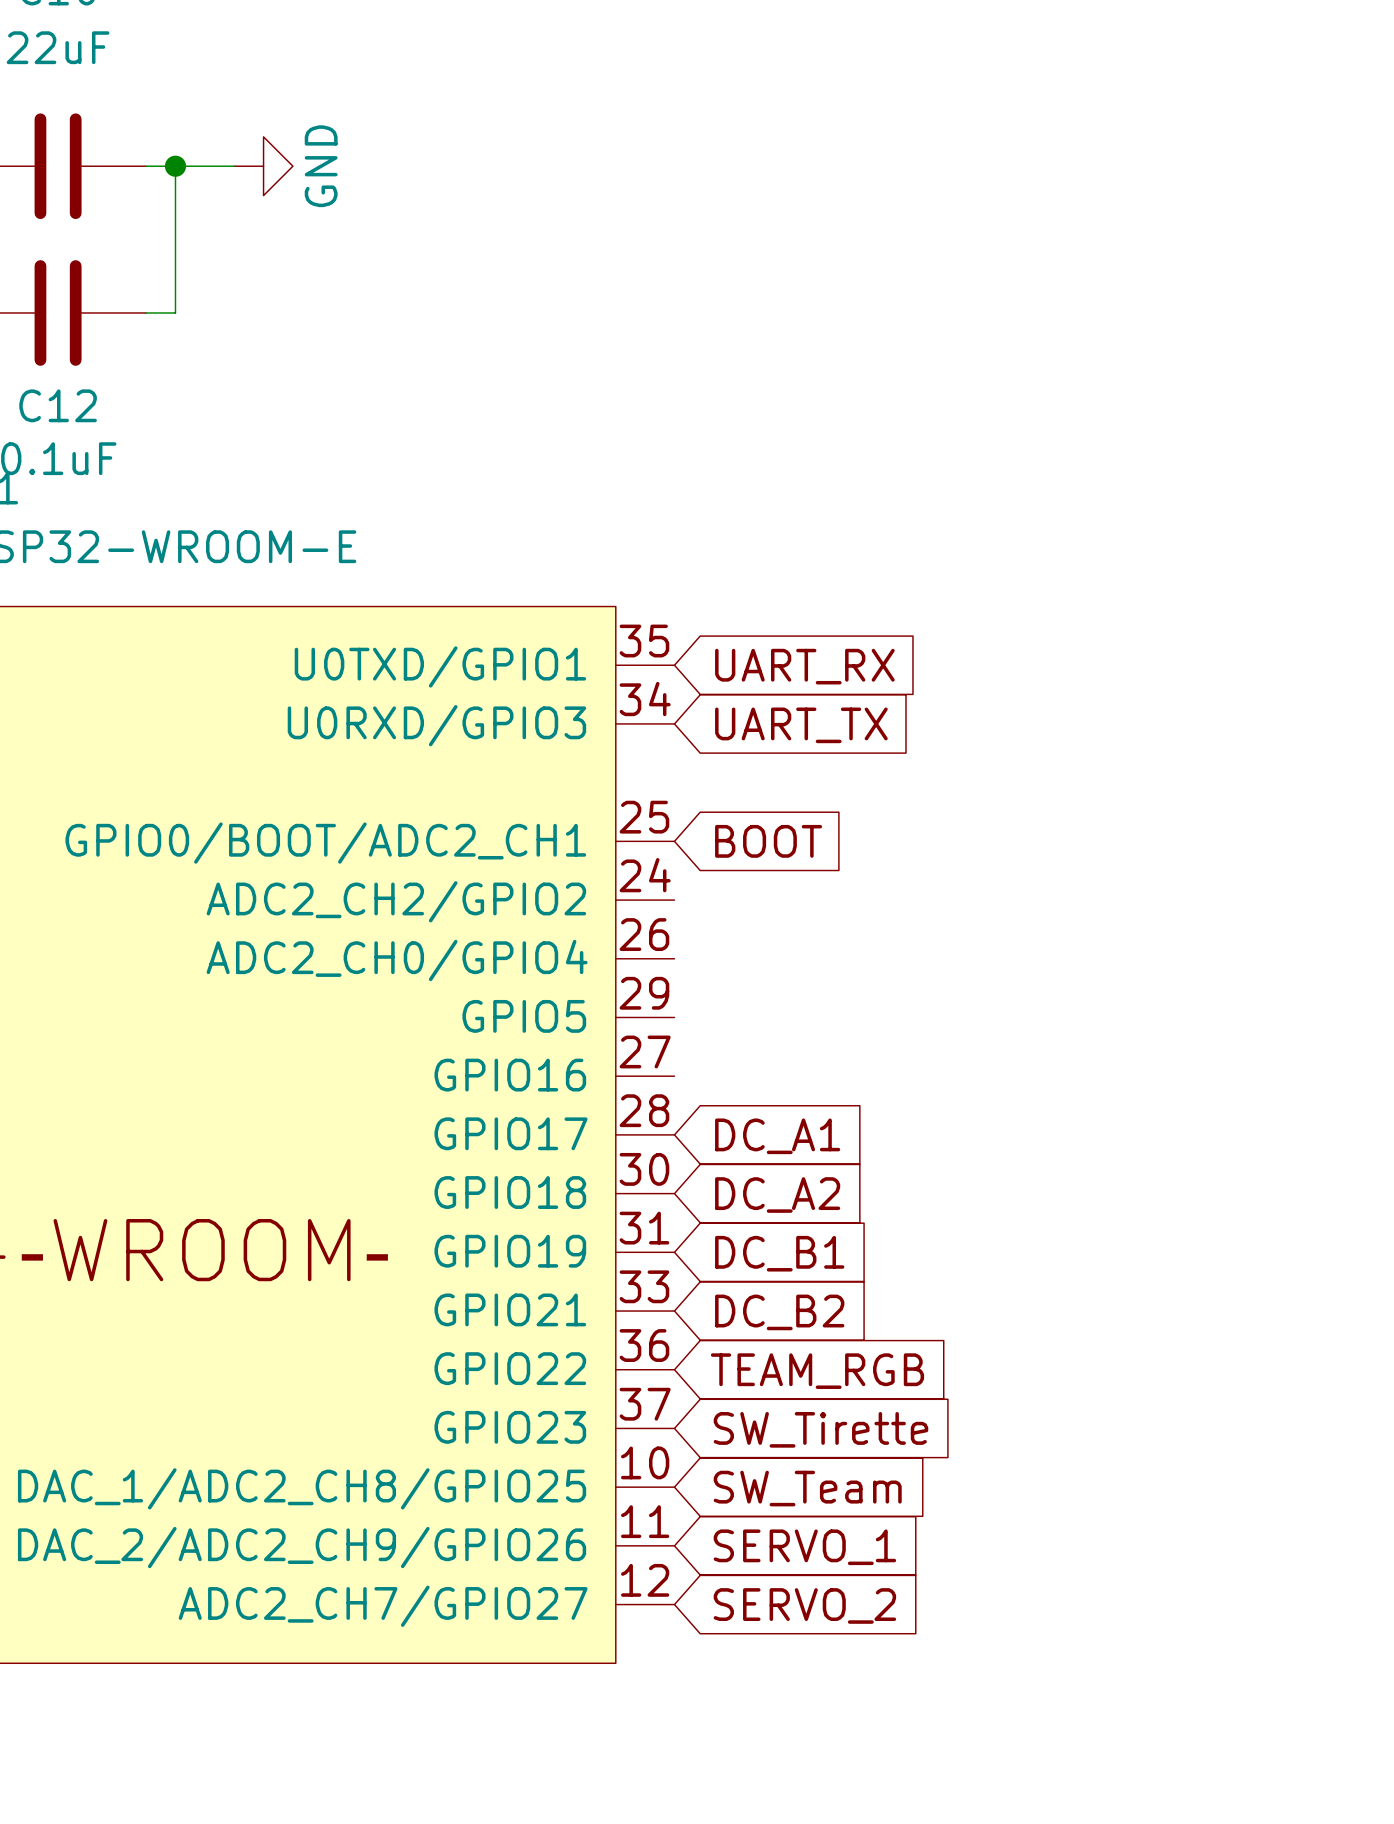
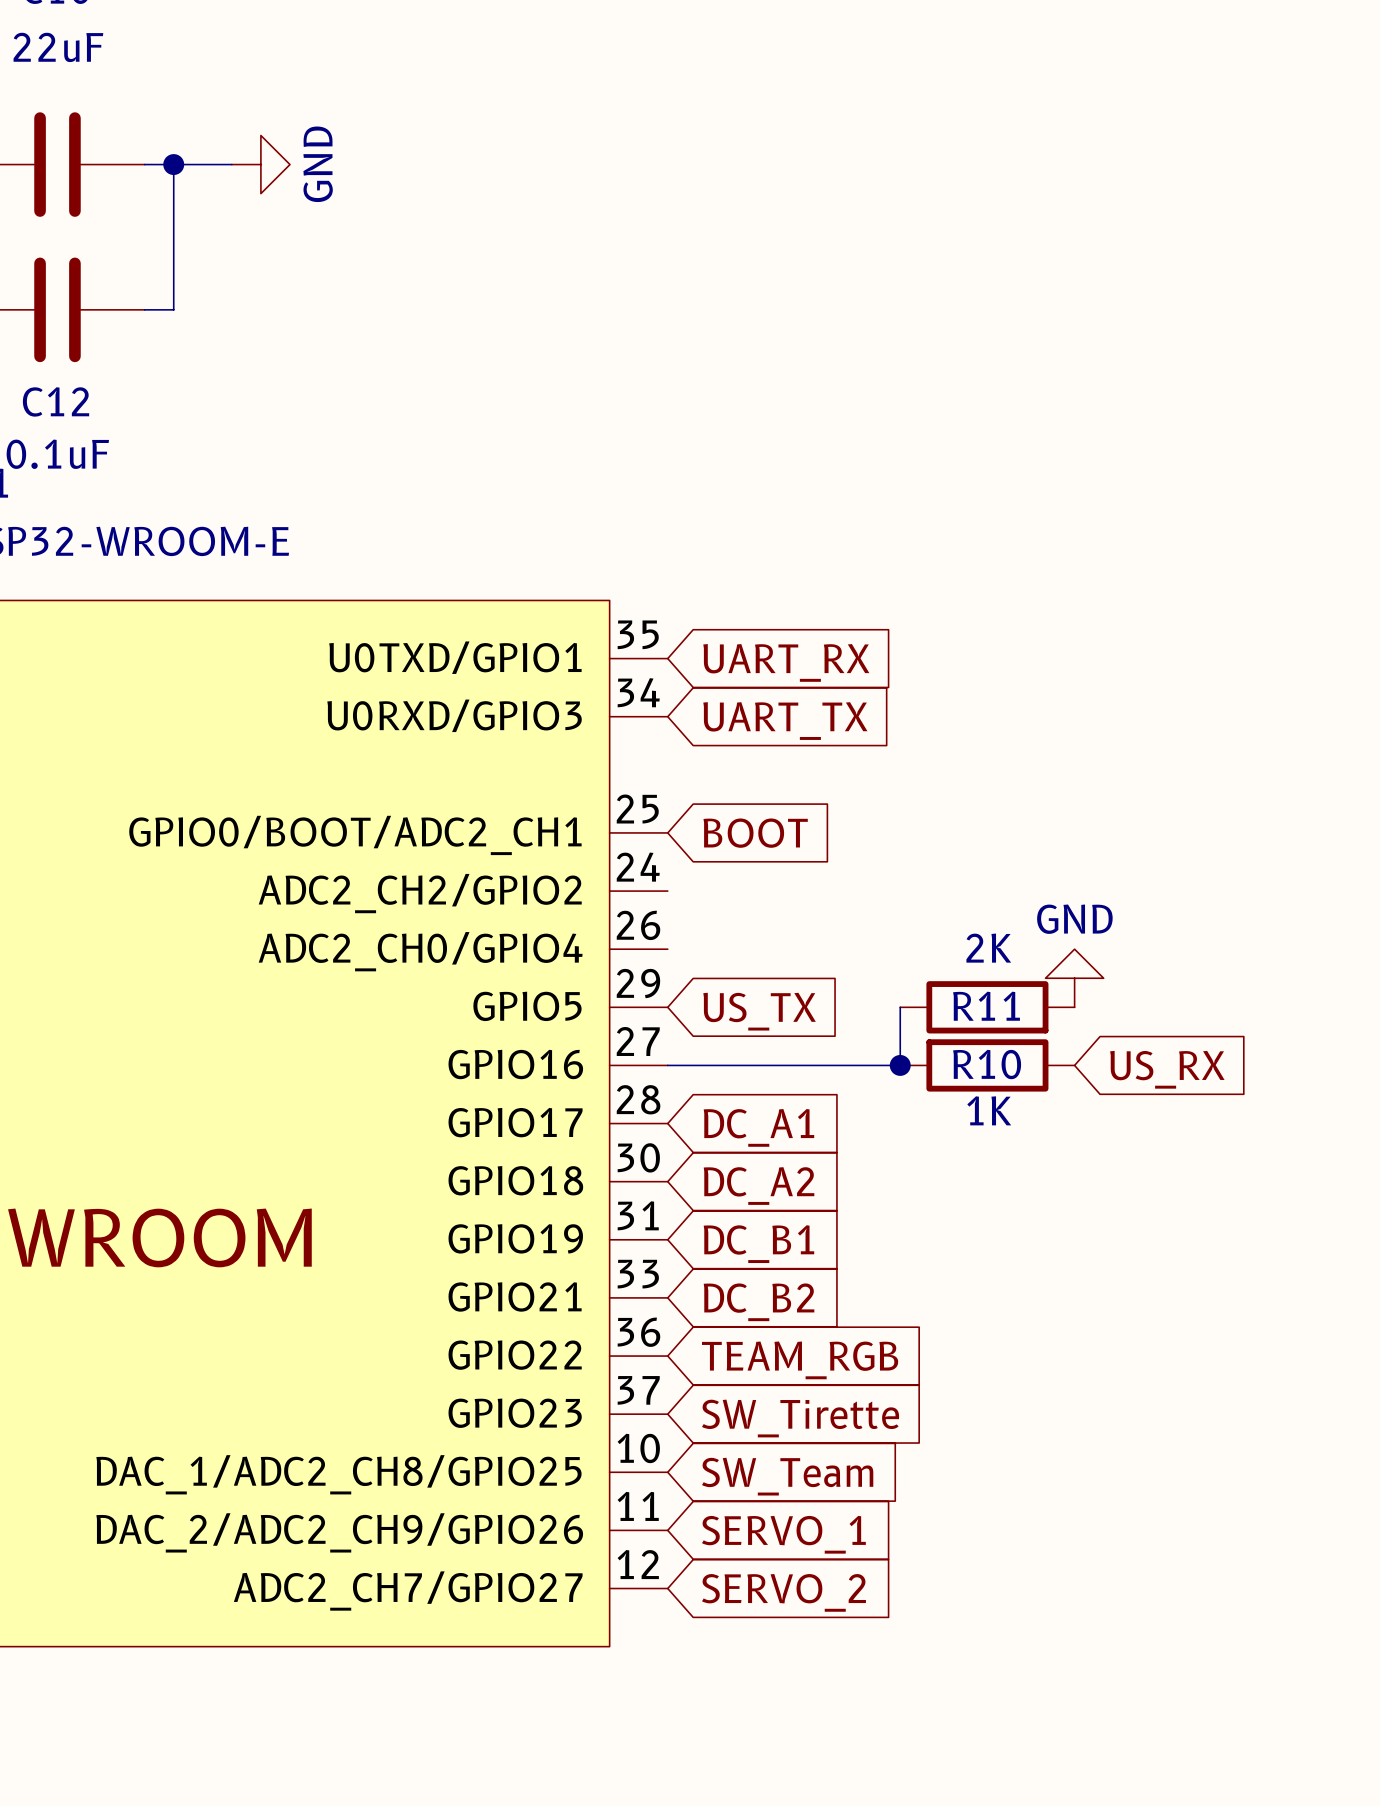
power symbol: none -> GND (1074, 978)
wire: none -> (900, 1007) (900, 1065) (667, 1065)
R11: none -> 2K (987, 1007)
global label: none -> US_TX (759, 1011)
junction: none -> (900, 1065)
R10: none -> 1K (987, 1065)
global label: none -> US_RX (1167, 1069)

